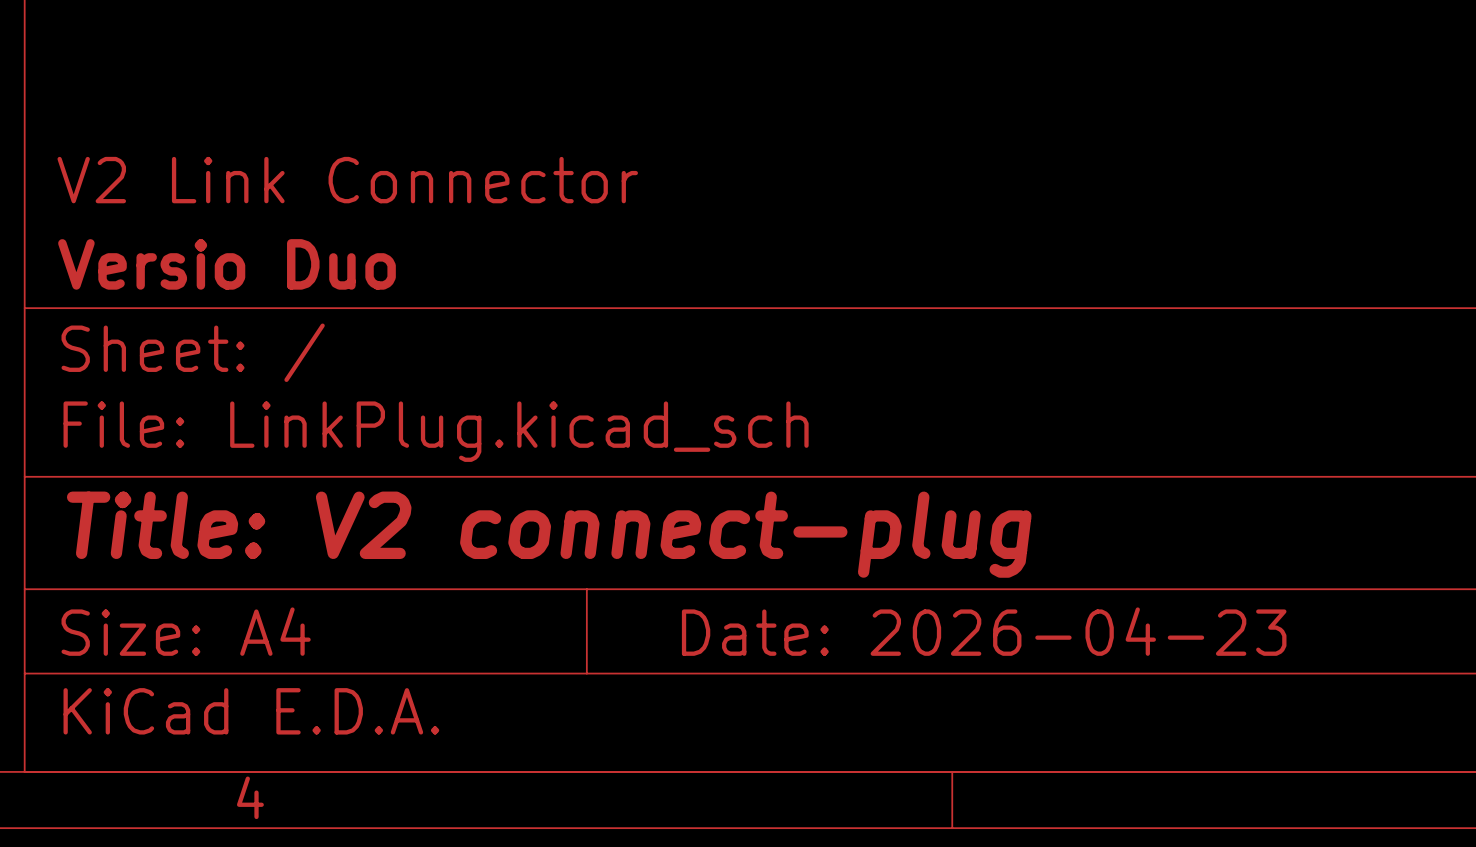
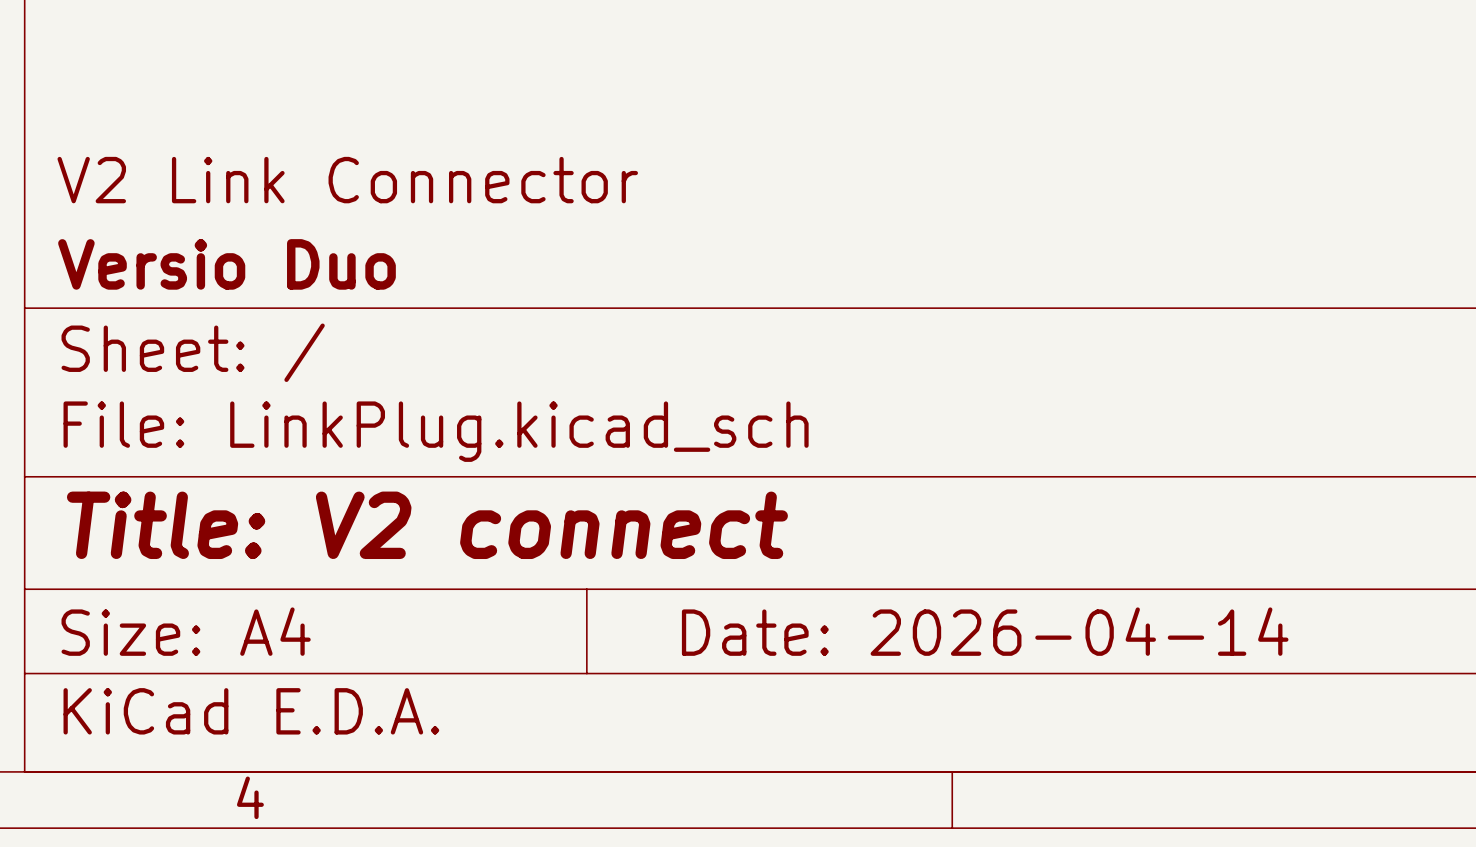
title block: Title: V2 connect-plug (549, 534) -> Title: V2 connect (427, 525)
title block: Date: 2026-04-23 (984, 631) -> Date: 2026-04-14 (985, 631)

